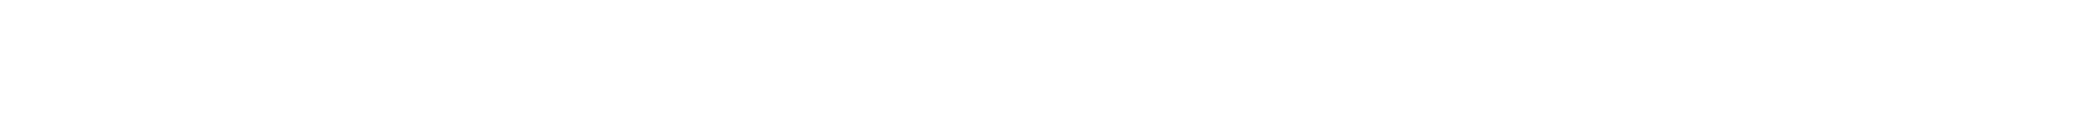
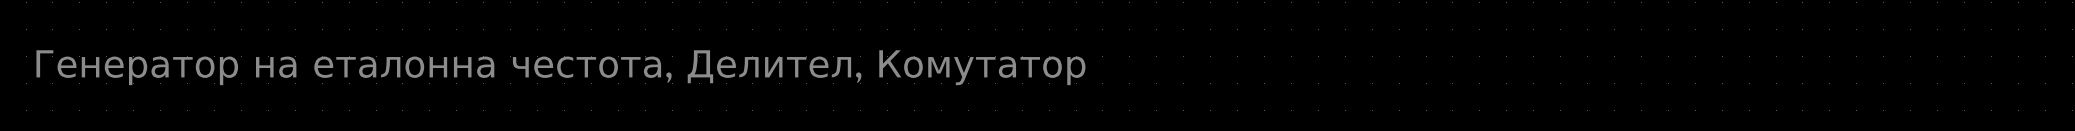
text: none -> Генератор на еталонна честота, Делител, Комутатор (560, 67)

